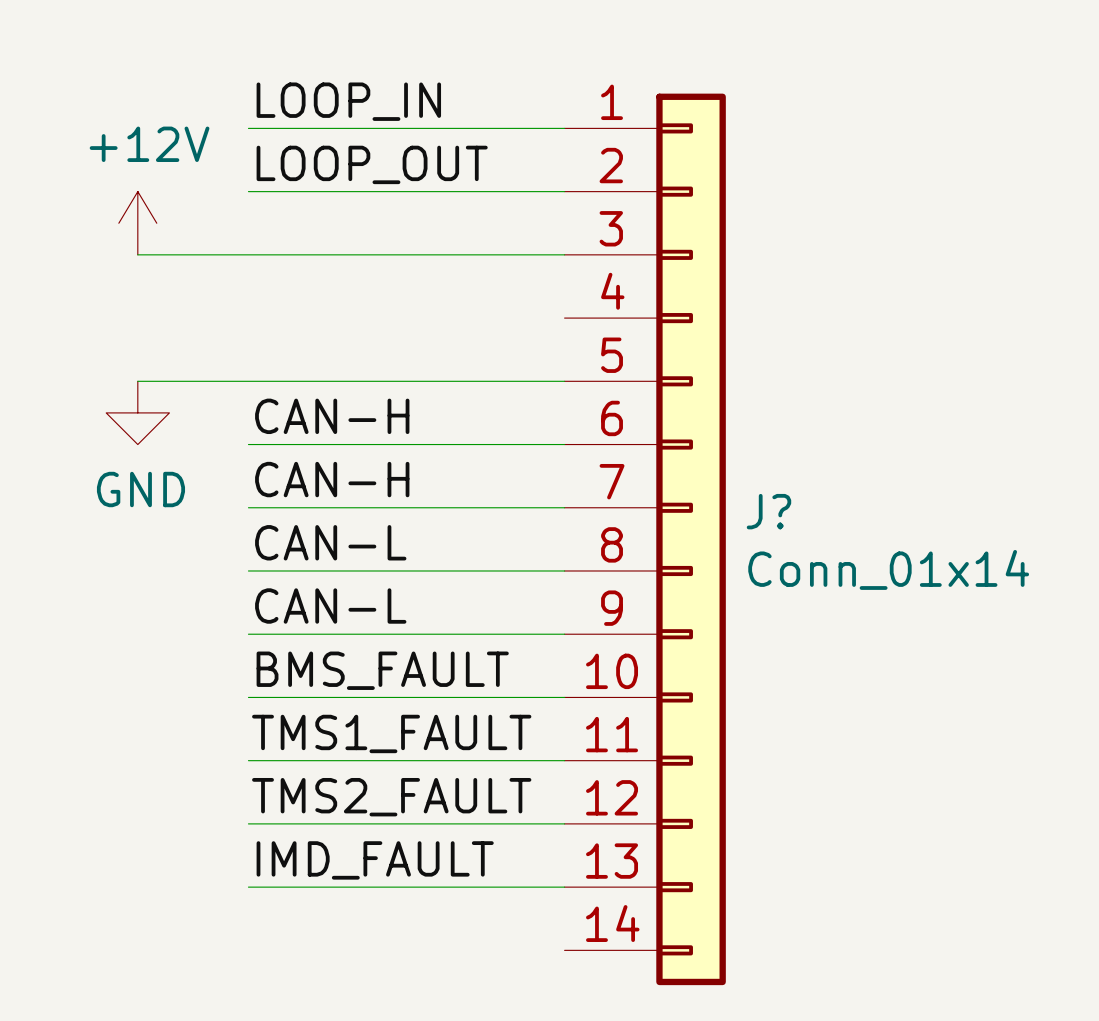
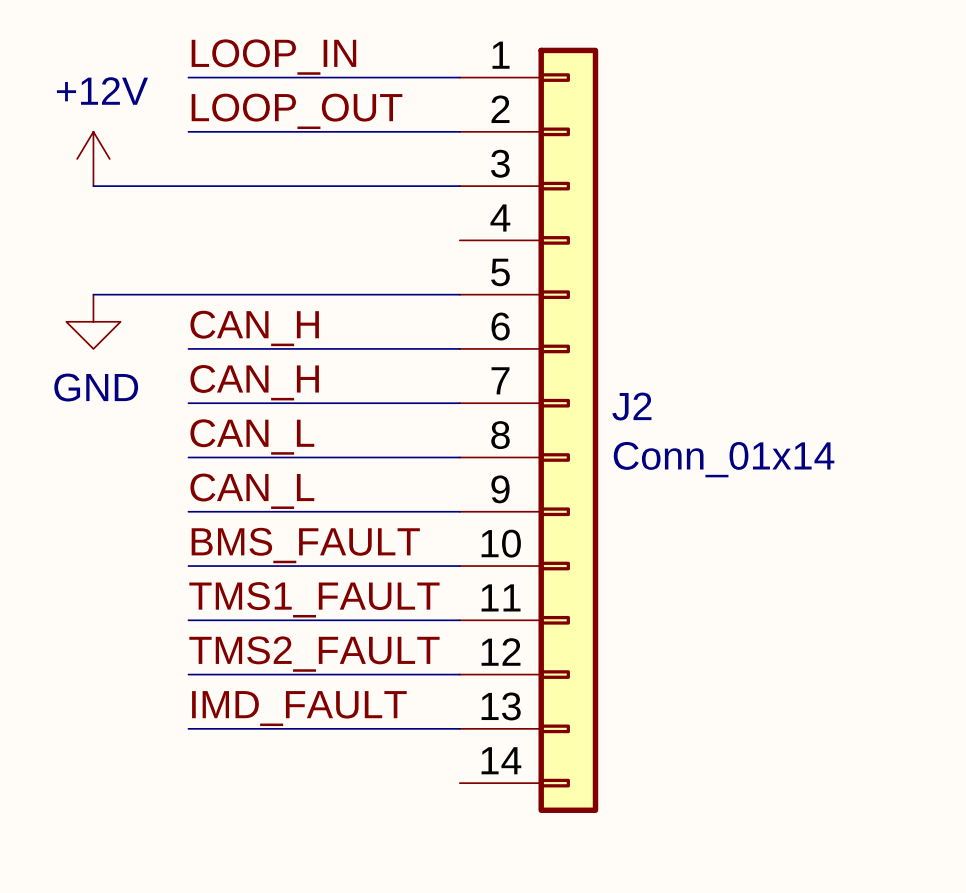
label: CAN-H (332, 416) -> CAN_H (254, 328)
label: CAN-H (332, 479) -> CAN_H (254, 382)
J? name: J? (768, 511) -> J2 (631, 406)
label: CAN-L (330, 542) -> CAN_L (252, 436)
label: CAN-L (330, 606) -> CAN_L (252, 491)

